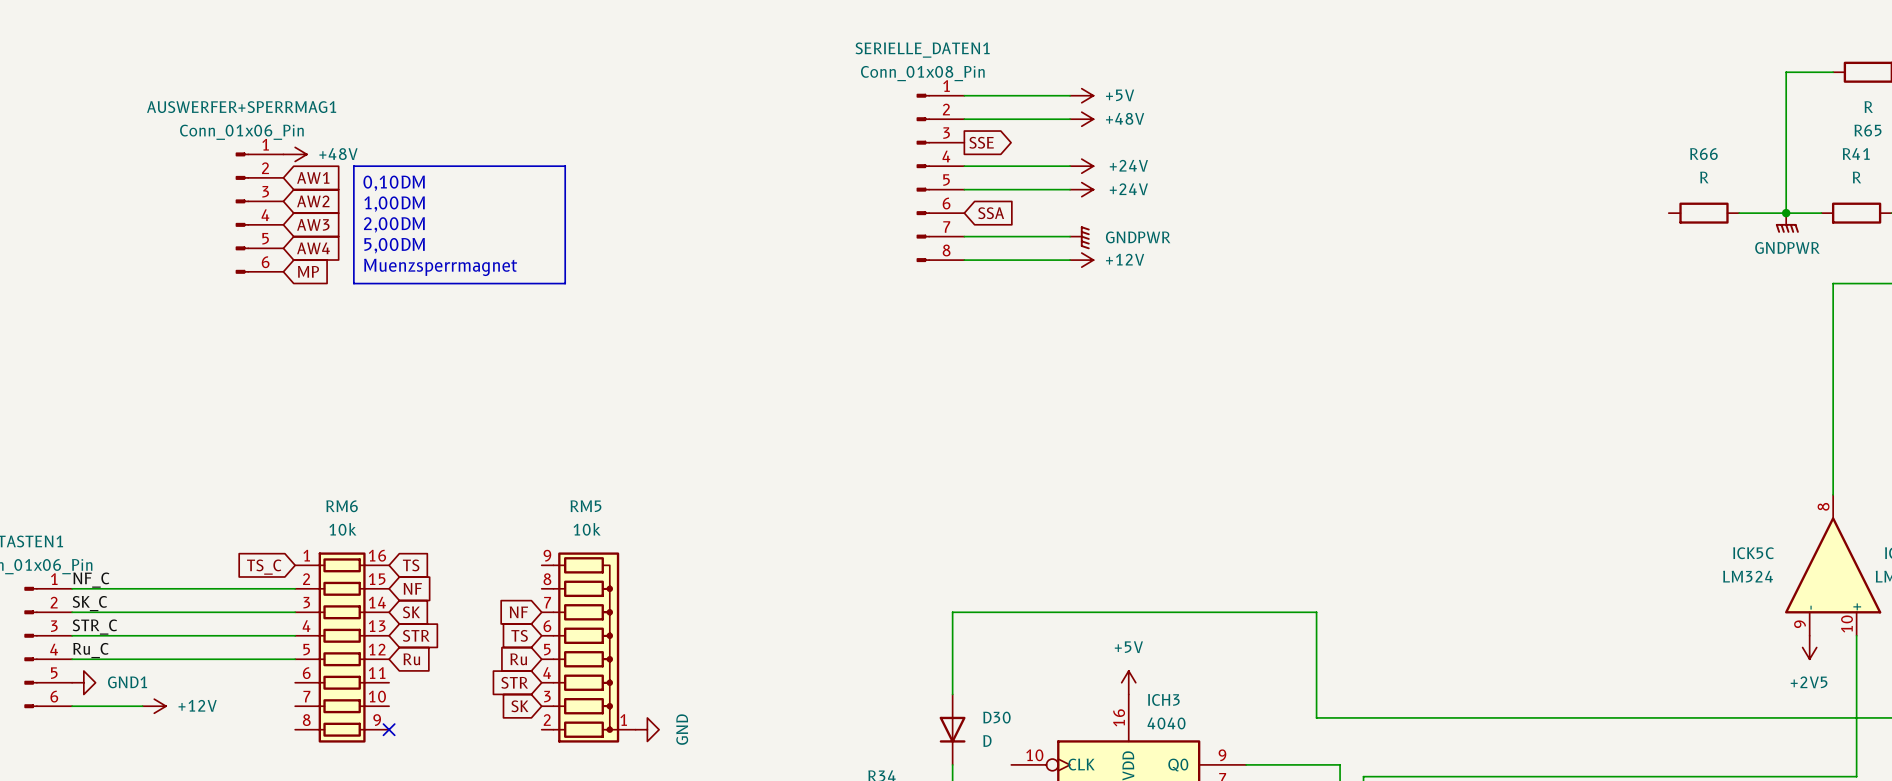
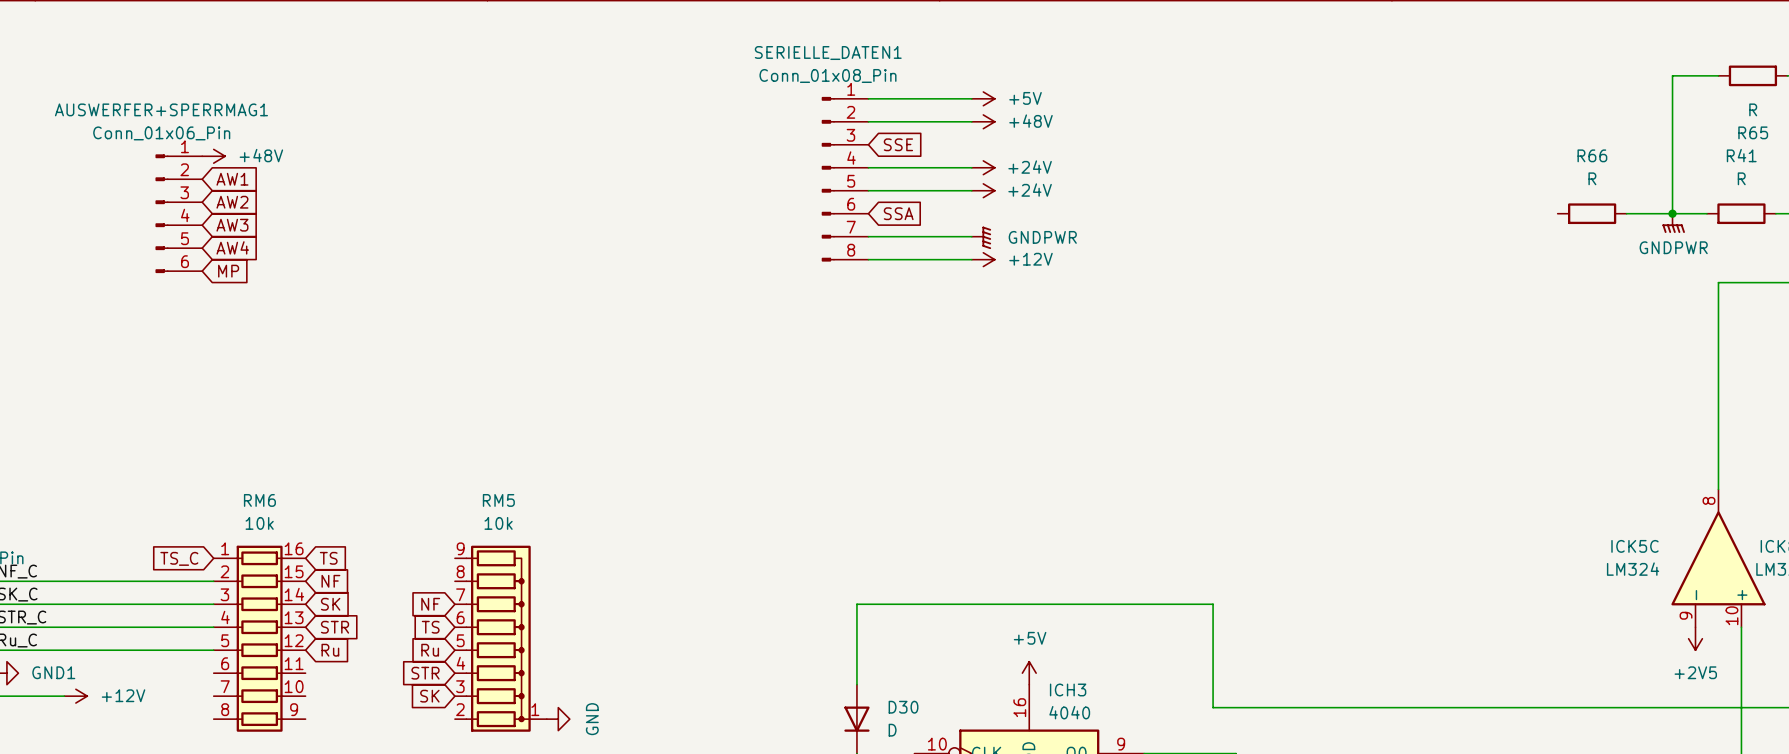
global label shape: output (981, 142) -> input (898, 144)
line: (353, 166) (565, 166) (565, 283) (353, 283) (353, 166) -> none
text: 0,10DM (394, 183) -> none
text: 1,00DM (394, 204) -> none
text: 2,00DM (394, 224) -> none
text: 5,00DM (394, 245) -> none
text: Muenzsperrmagnet (440, 267) -> none
no-connect mark: (389, 729) -> none

